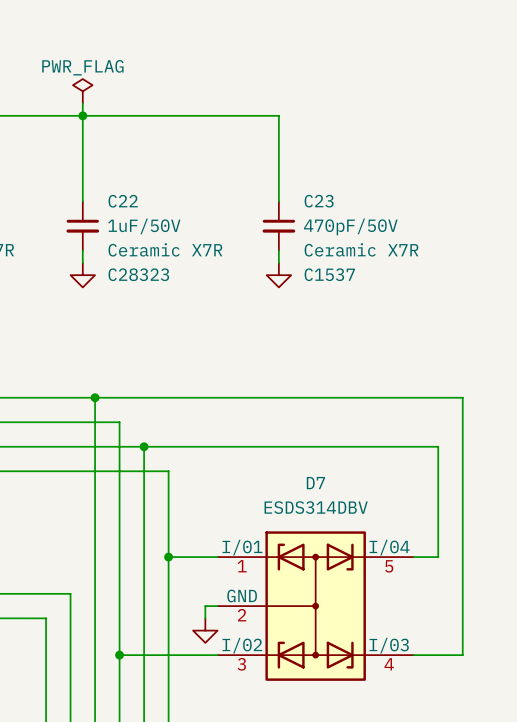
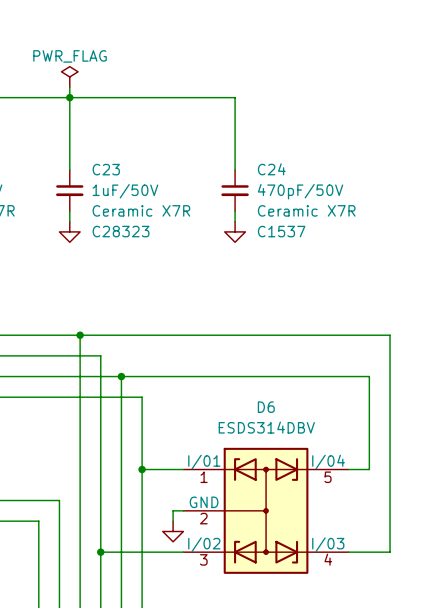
C22 name: C22 (123, 201) -> C23 (106, 169)
C23 name: C23 (319, 201) -> C24 (271, 169)
D7 name: D7 (315, 483) -> D6 (266, 407)

